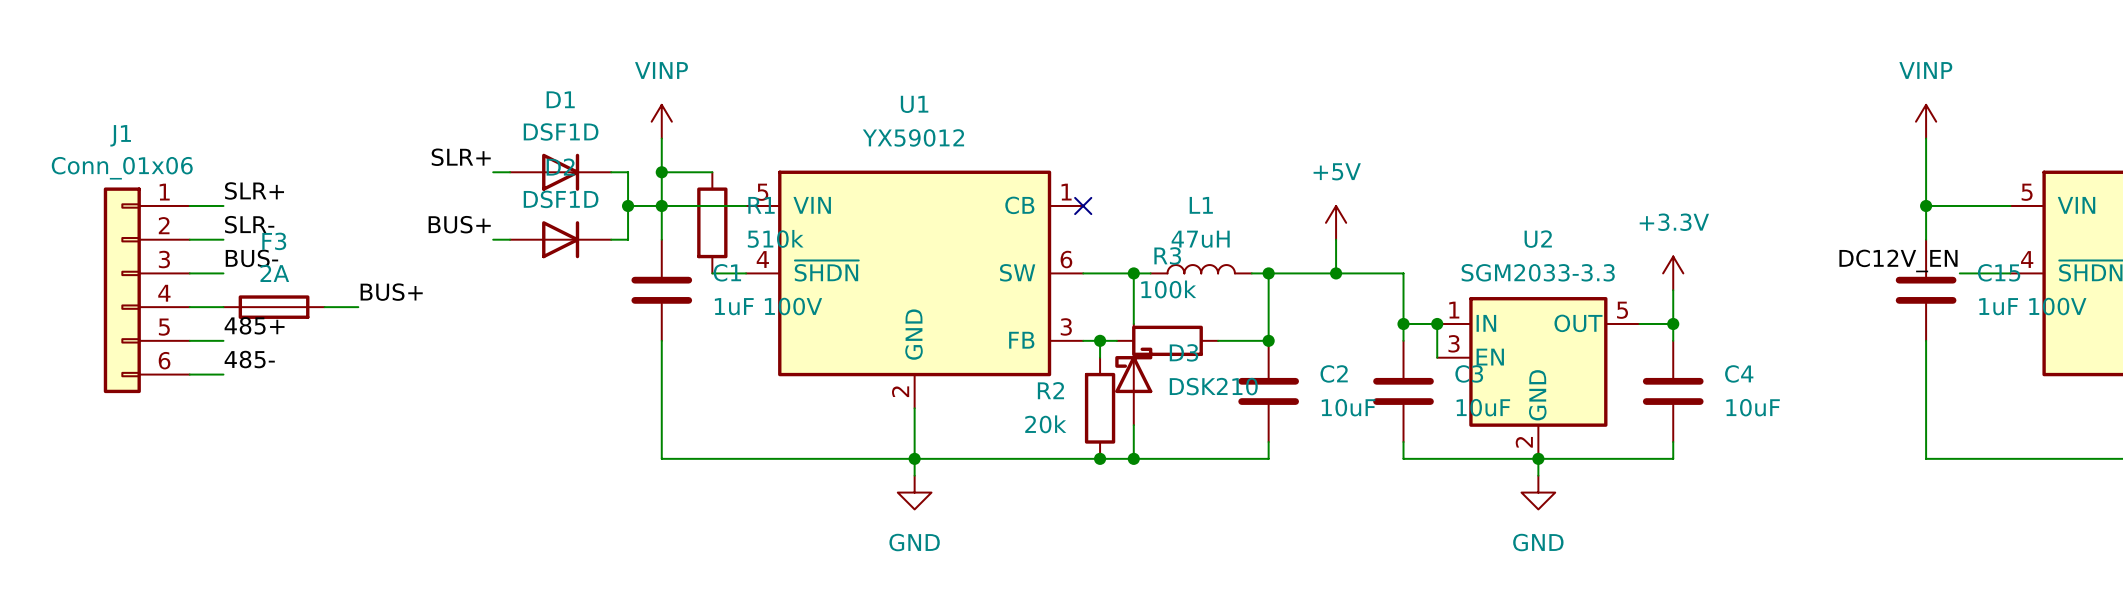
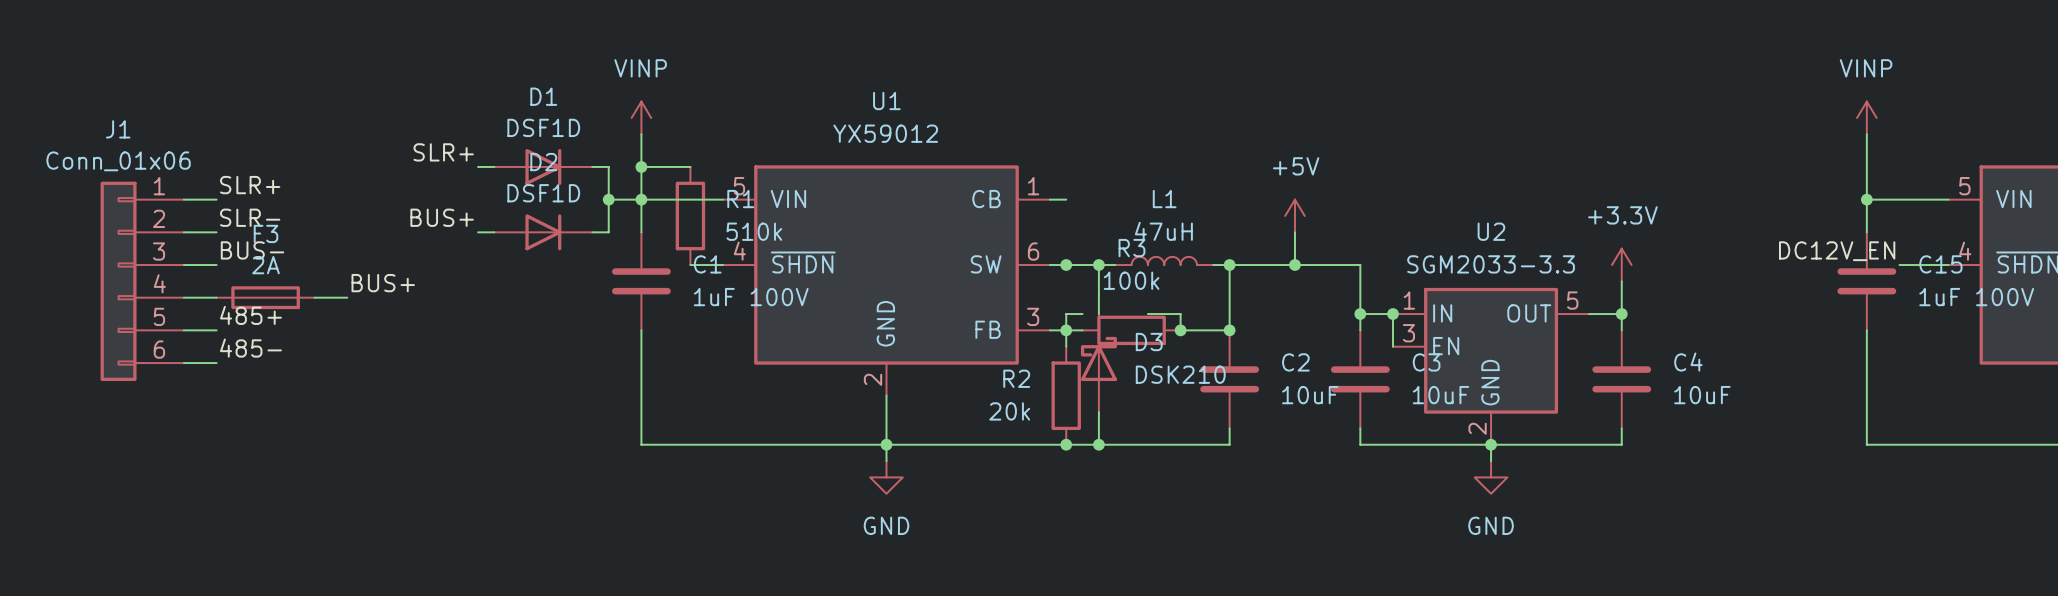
wire: none -> (1049, 199) (1066, 199)
no-connect mark: (1083, 205) -> none
junction: none -> (1066, 265)
wire: none -> (1082, 314) (1066, 314) (1066, 330)
wire: none -> (1147, 314) (1180, 314) (1180, 330)
junction: none -> (1180, 330)

